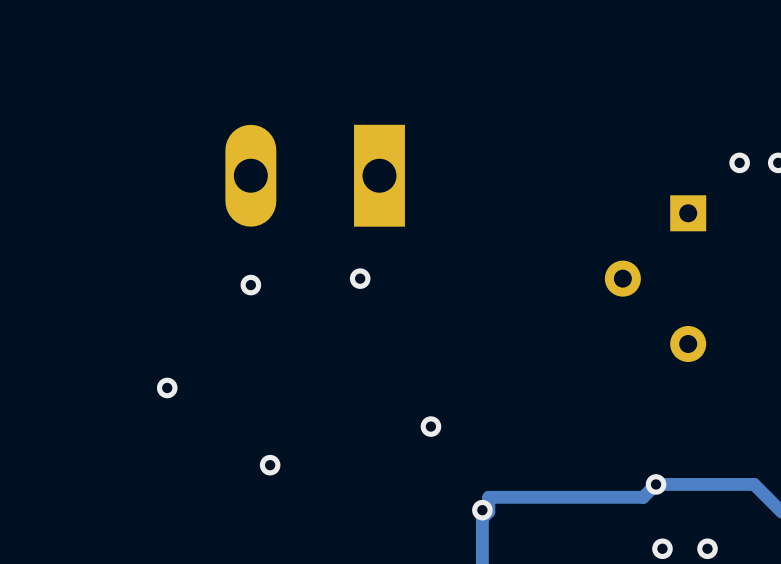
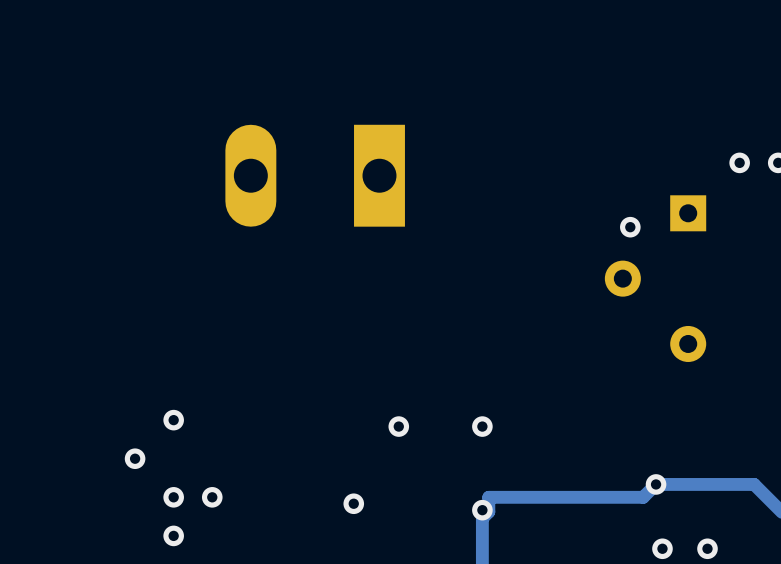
via: none -> (630, 227)
via: (360, 278) -> none
via: (250, 285) -> none
via position: (167, 387) -> (173, 420)
via: none -> (398, 426)
via: (430, 426) -> none
via: none -> (482, 426)
via: none -> (135, 458)
via: (270, 465) -> none
via: none -> (173, 497)
via: none -> (212, 497)
via: none -> (353, 503)
via: none -> (173, 535)

